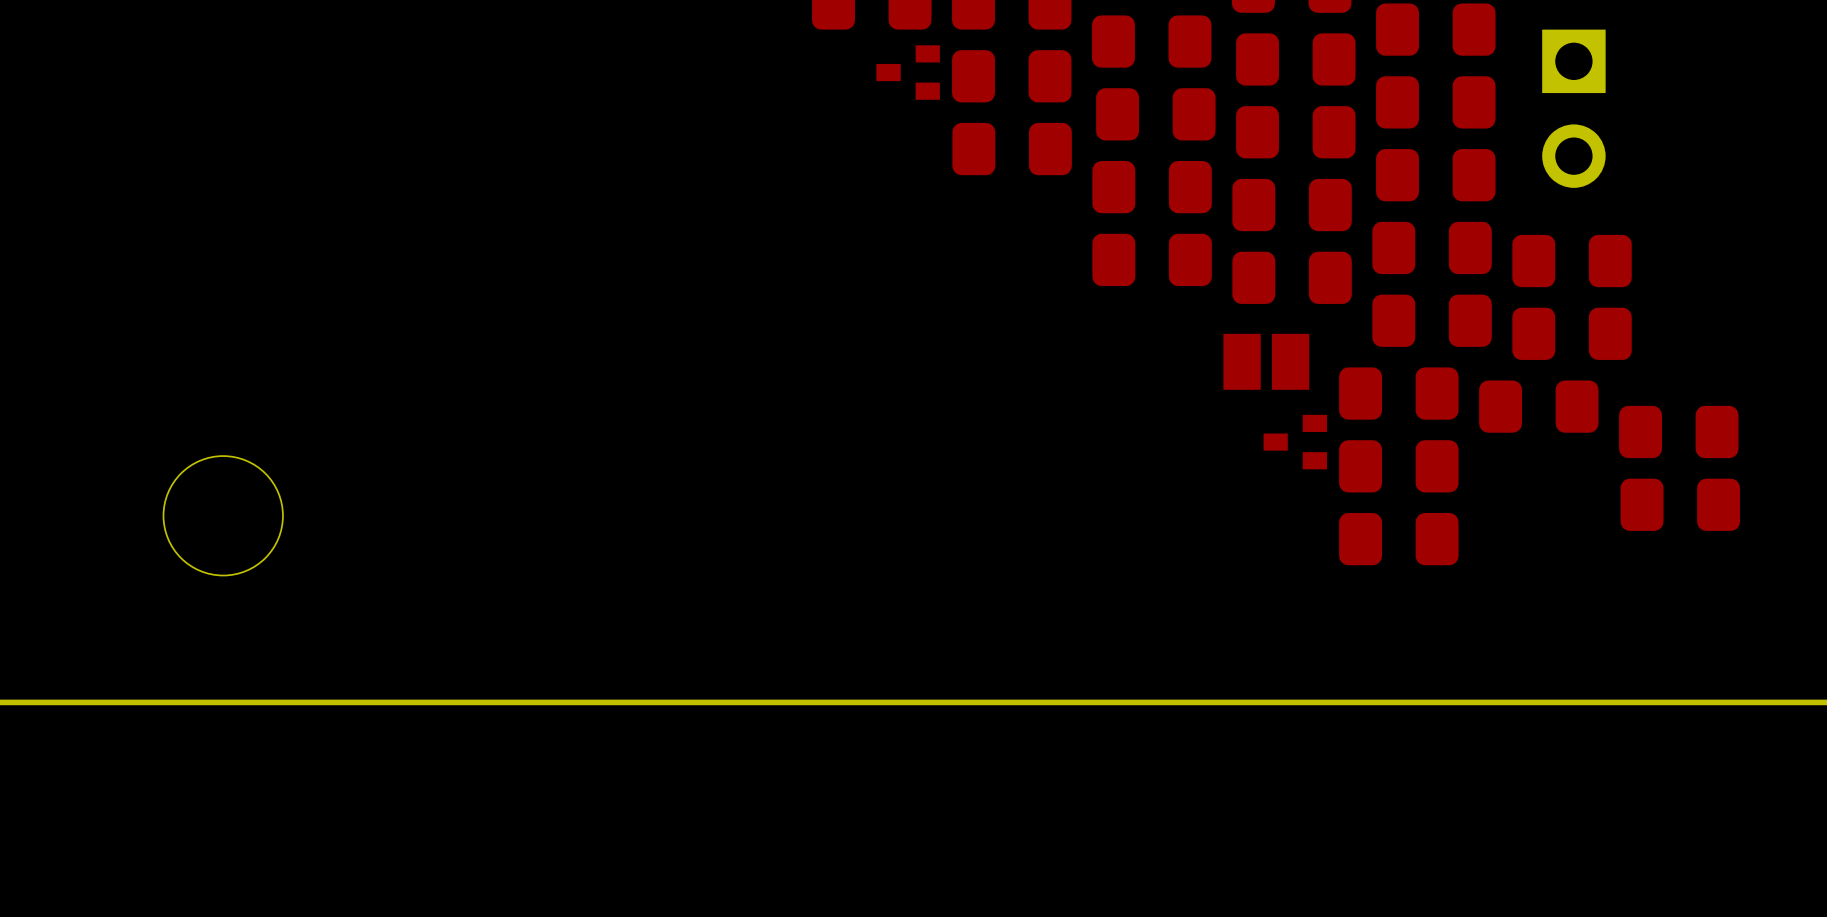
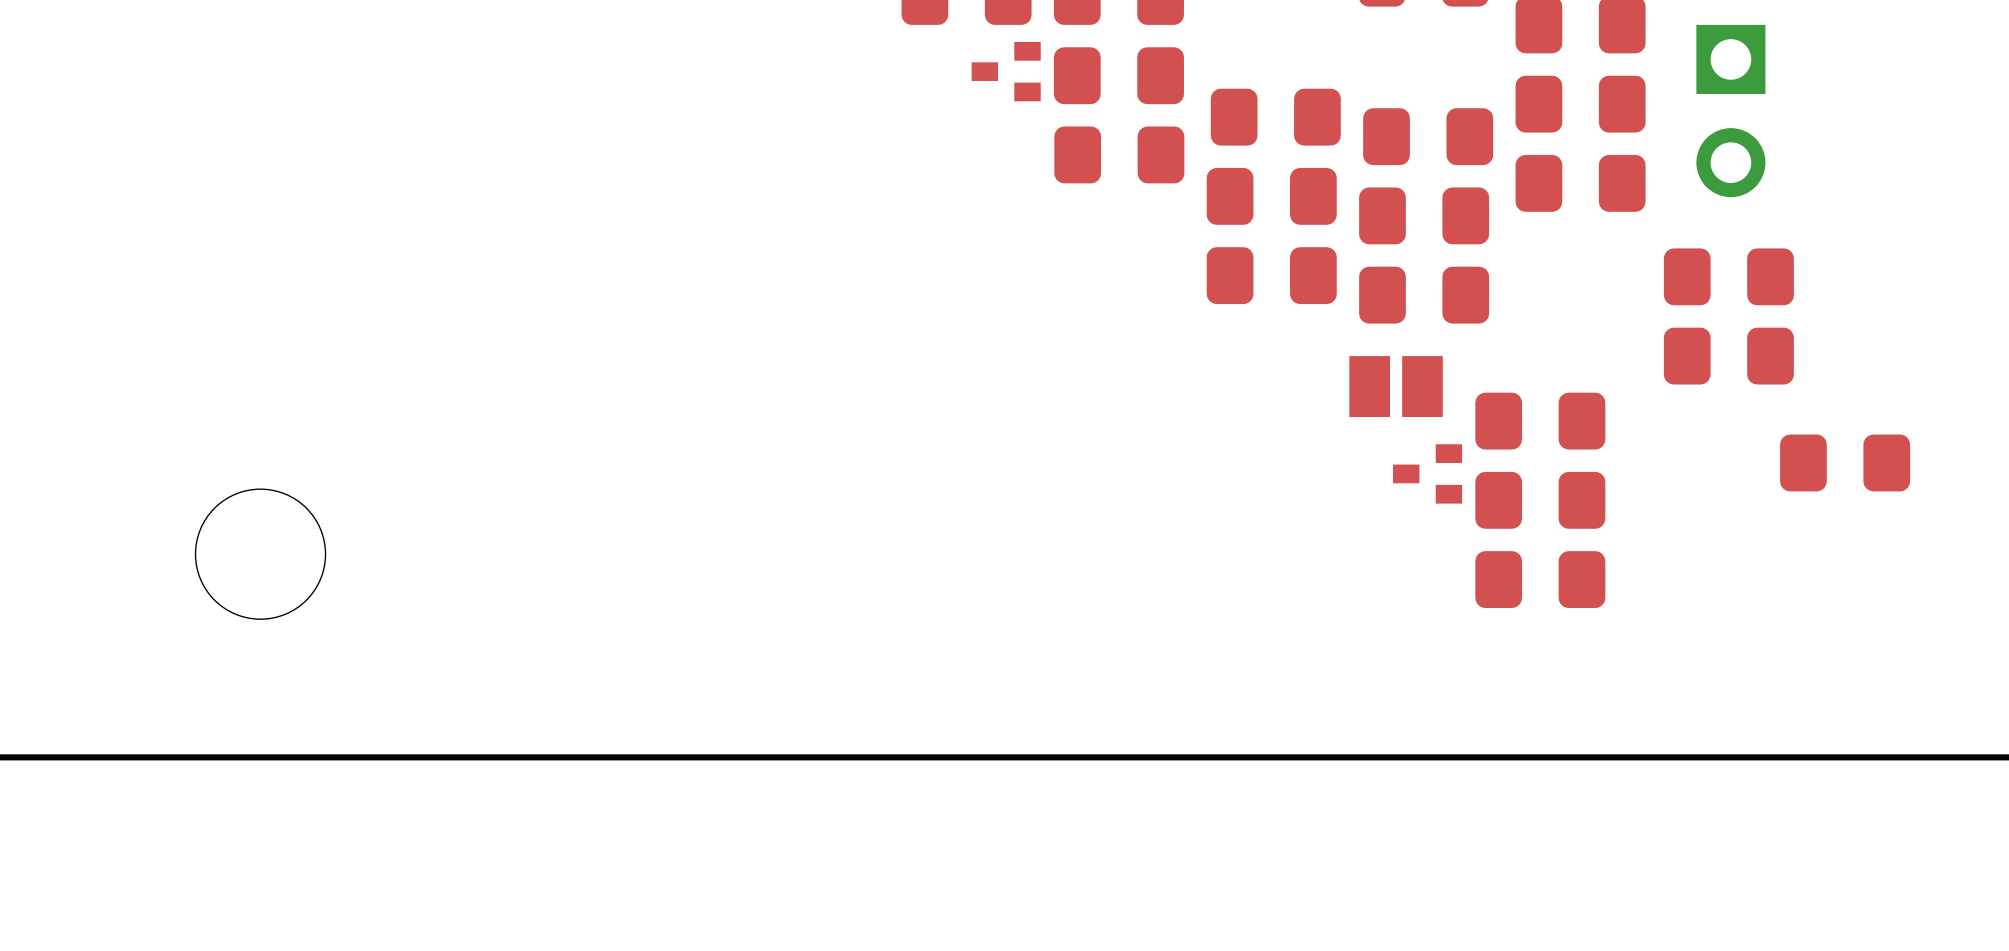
part: (1151, 41) -> none
part: (1295, 59) -> none
part: (1432, 247) -> none
part: (1432, 320) -> none
part: (1538, 406) -> none
part: (1680, 504) -> none

